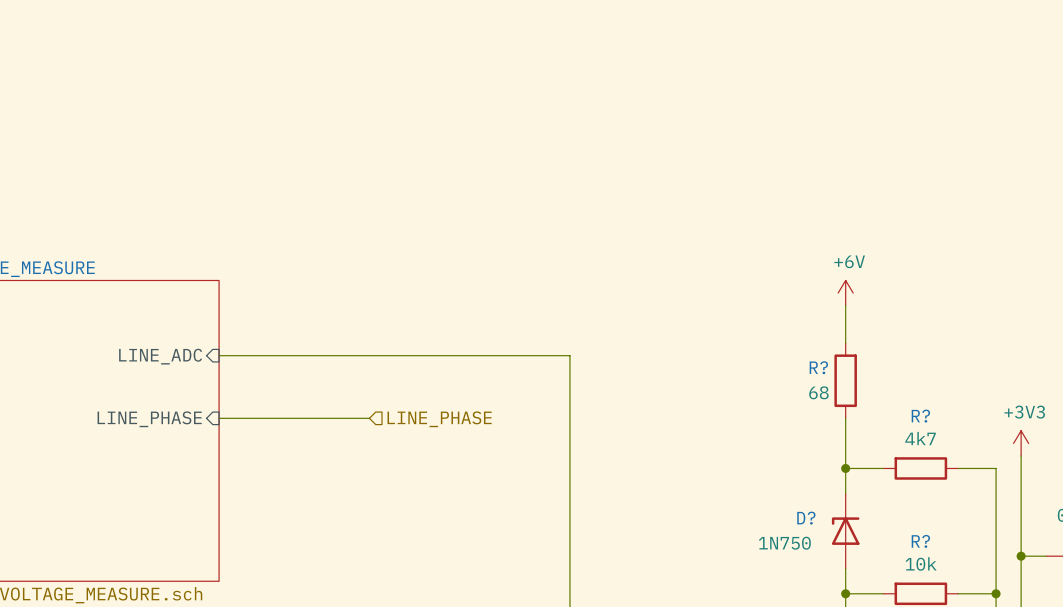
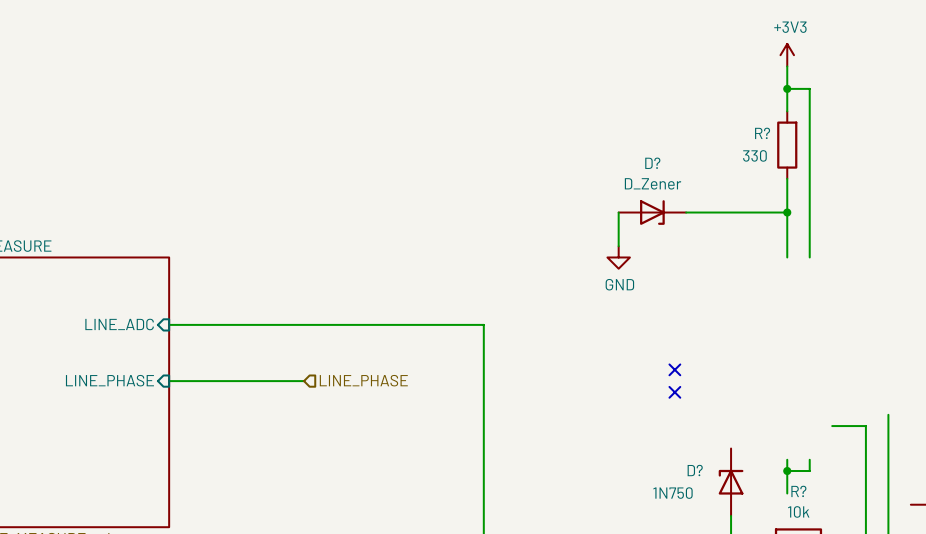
power symbol: none -> +3V3 (787, 55)
wire: none -> (787, 66) (787, 111)
wire: none -> (787, 88) (809, 88) (809, 257)
junction: none -> (787, 88)
R?: none -> 330 (787, 145)
wire: none -> (787, 178) (787, 257)
D?: none -> D_Zener (652, 212)
wire: none -> (686, 212) (787, 212)
junction: none -> (787, 212)
power symbol: none -> GND (618, 257)
power symbol: +6V (845, 293) -> none
wire: (845, 305) (845, 343) -> (618, 212) (618, 246)
R?: 68 (845, 380) -> none
no-connect mark: none -> (674, 369)
wire: (845, 418) (845, 493) -> none
no-connect mark: none -> (674, 392)
power symbol: +3V3 (1021, 443) -> none
wire: (845, 468) (883, 468) -> none
junction: (845, 468) -> none
R?: 4k7 (920, 468) -> none
wire: none -> (787, 459) (787, 493)
wire: none -> (809, 459) (809, 471) (787, 471)
junction: none -> (787, 471)
wire: (1021, 556) (1046, 556) -> none
junction: (1021, 556) -> none

